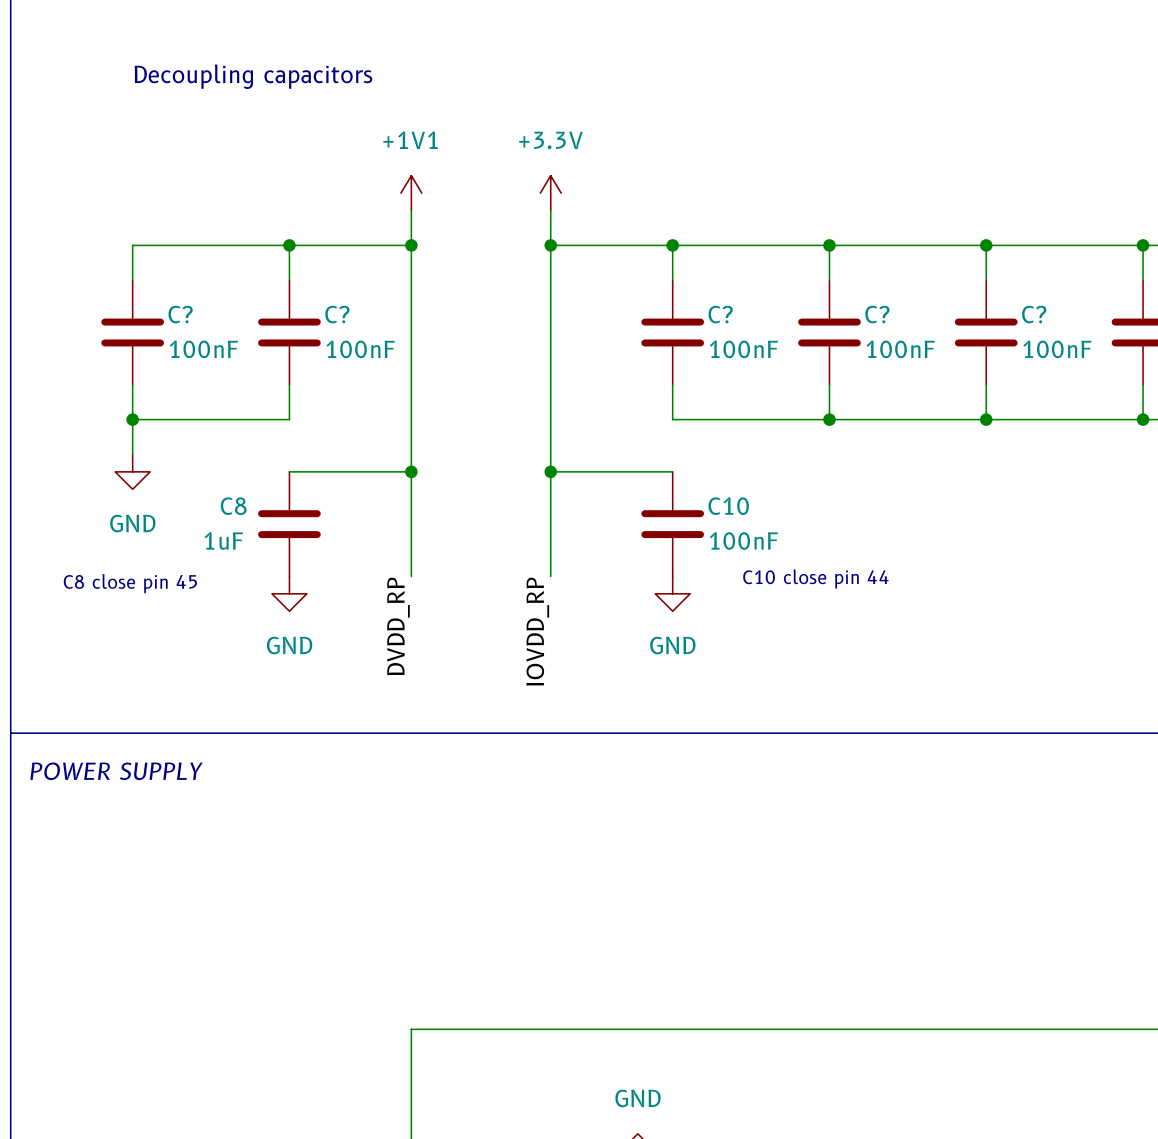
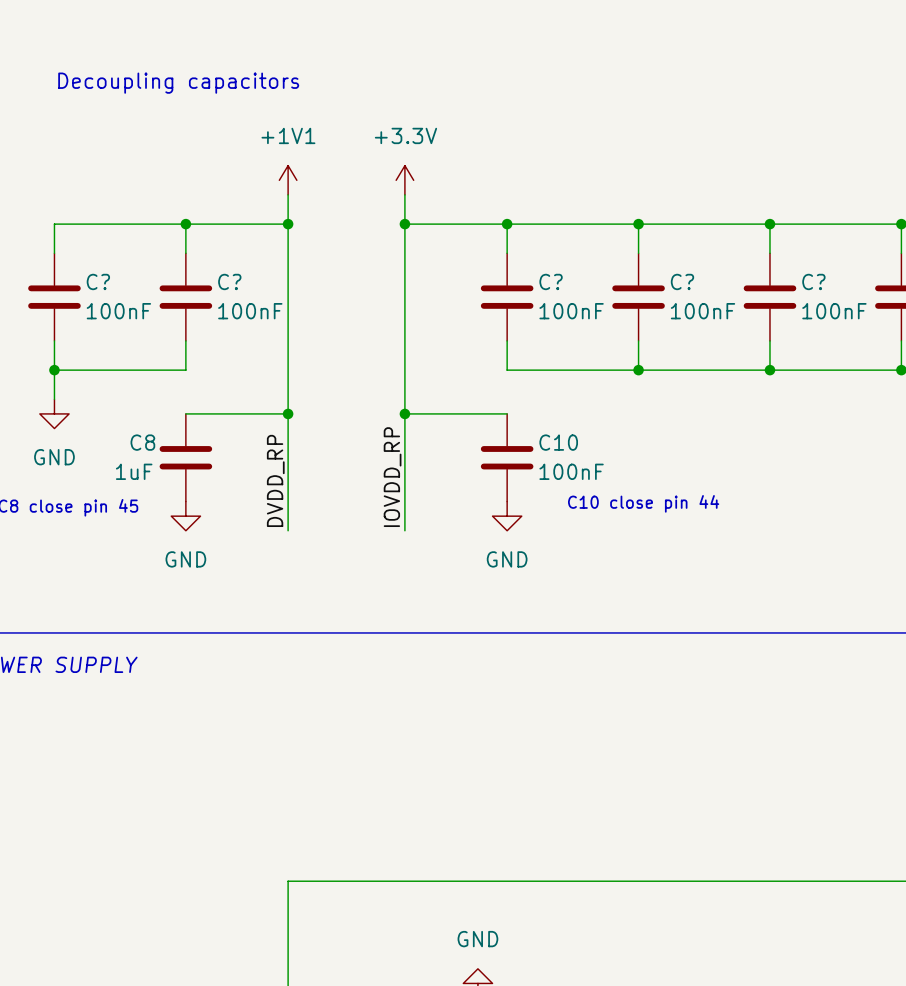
wire: none -> (288, 501) (288, 530)
wire: none -> (404, 501) (404, 530)
label position: DVDD_RP (398, 626) -> DVDD_RP (275, 480)
label position: IOVDD_RP (537, 631) -> IOVDD_RP (392, 477)

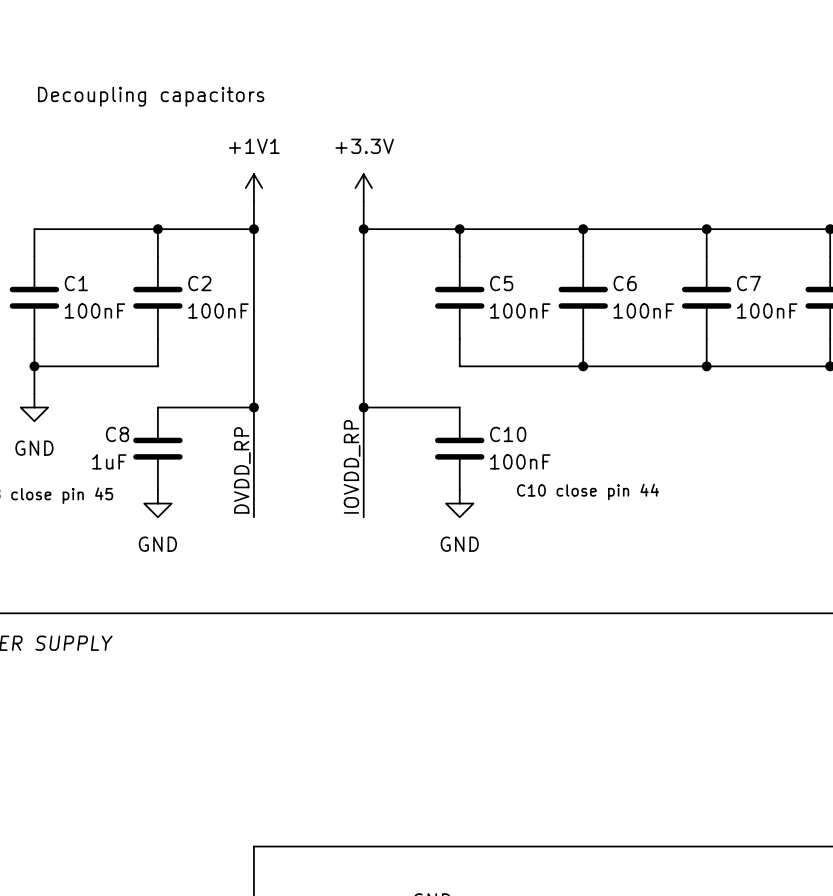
C? name: C? (98, 281) -> C1 (76, 283)
C? name: C? (229, 281) -> C2 (199, 283)
C? name: C? (551, 281) -> C5 (501, 283)
C? name: C? (682, 281) -> C6 (625, 283)
C? name: C? (813, 281) -> C7 (748, 283)

